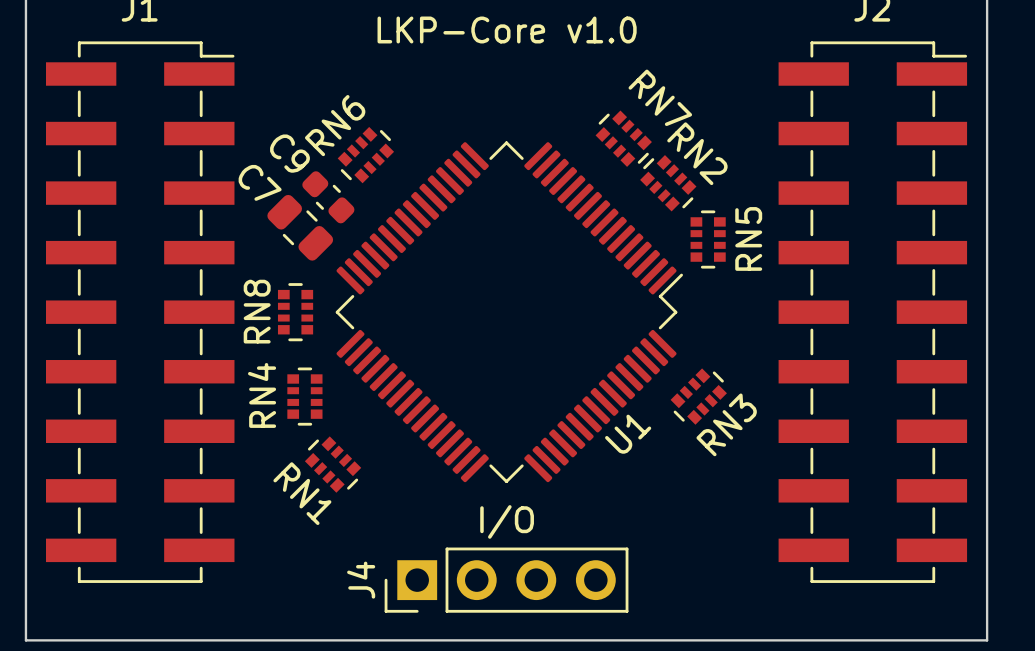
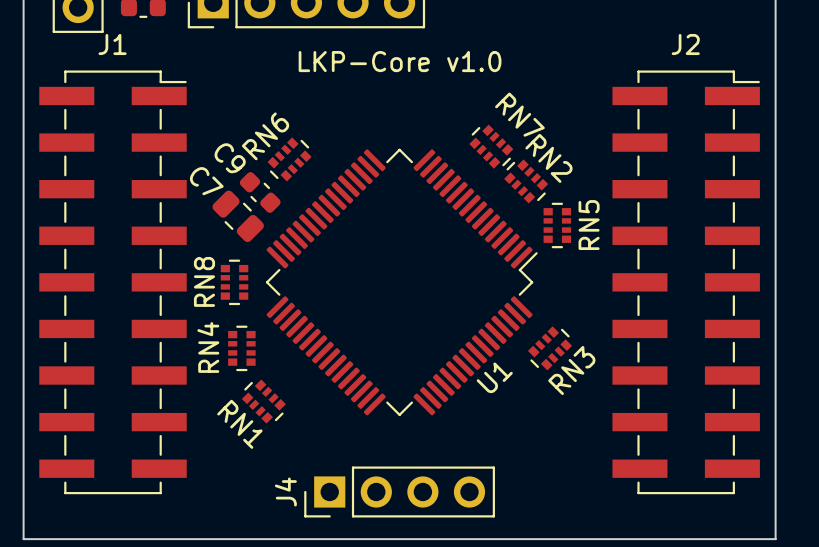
text: I/O (507, 521) -> none

